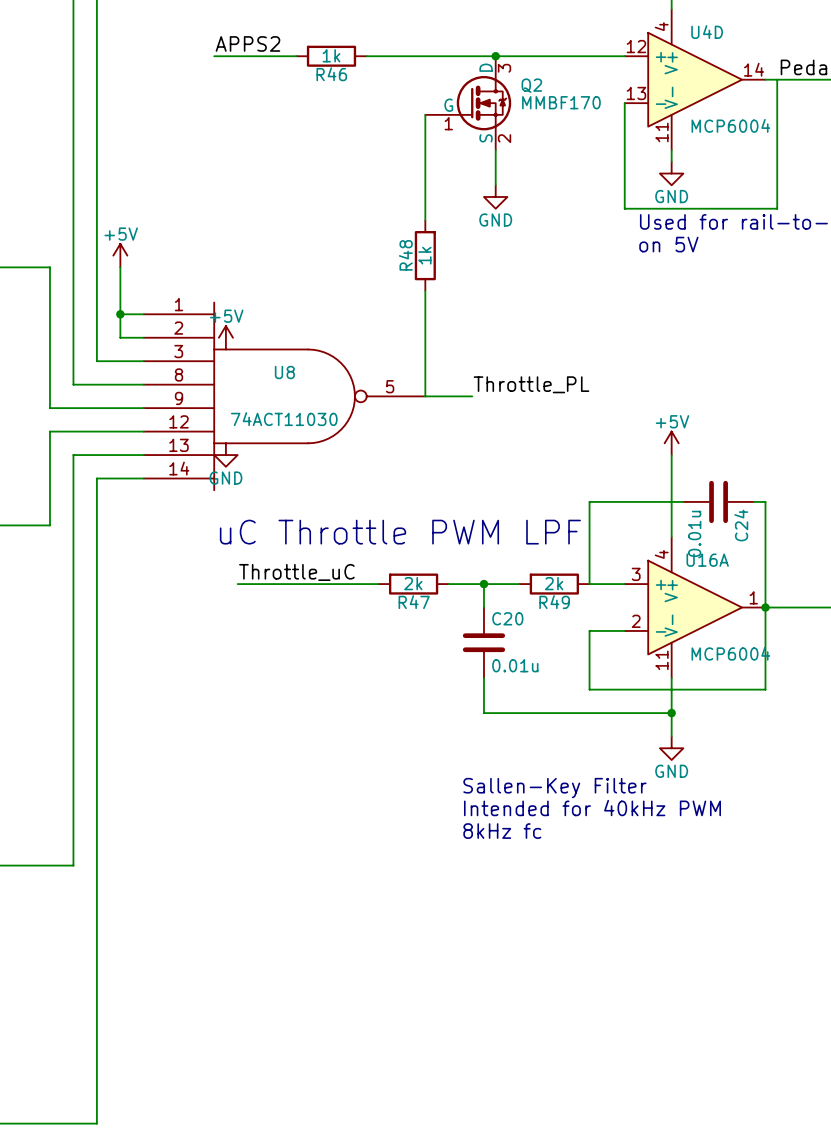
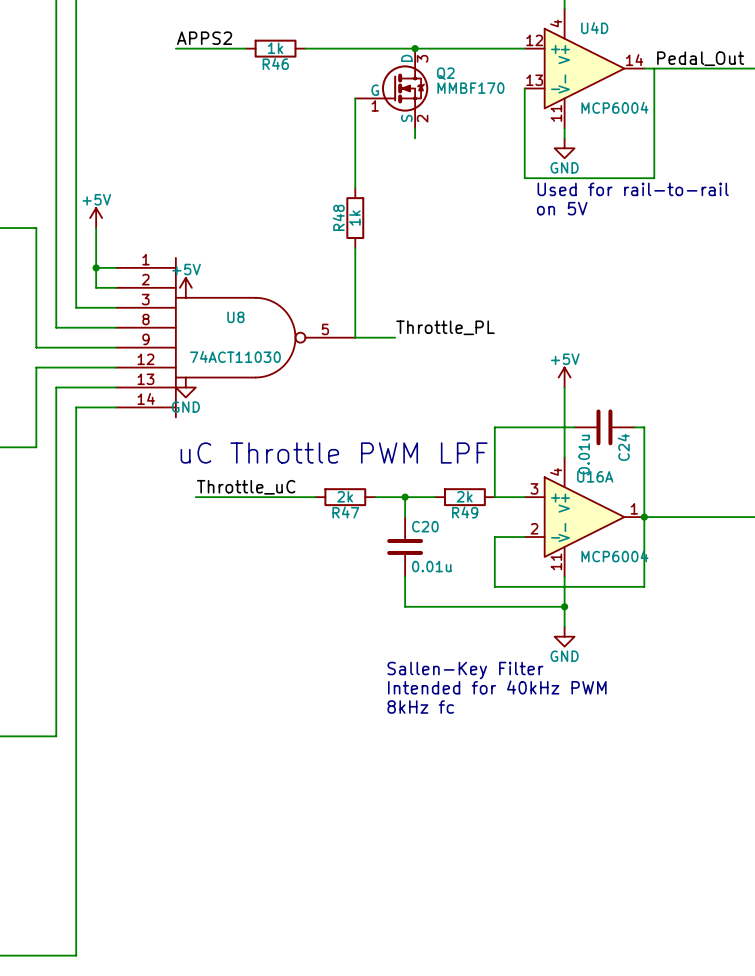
wire: (495, 161) (495, 185) -> none
power symbol: GND (495, 196) -> none

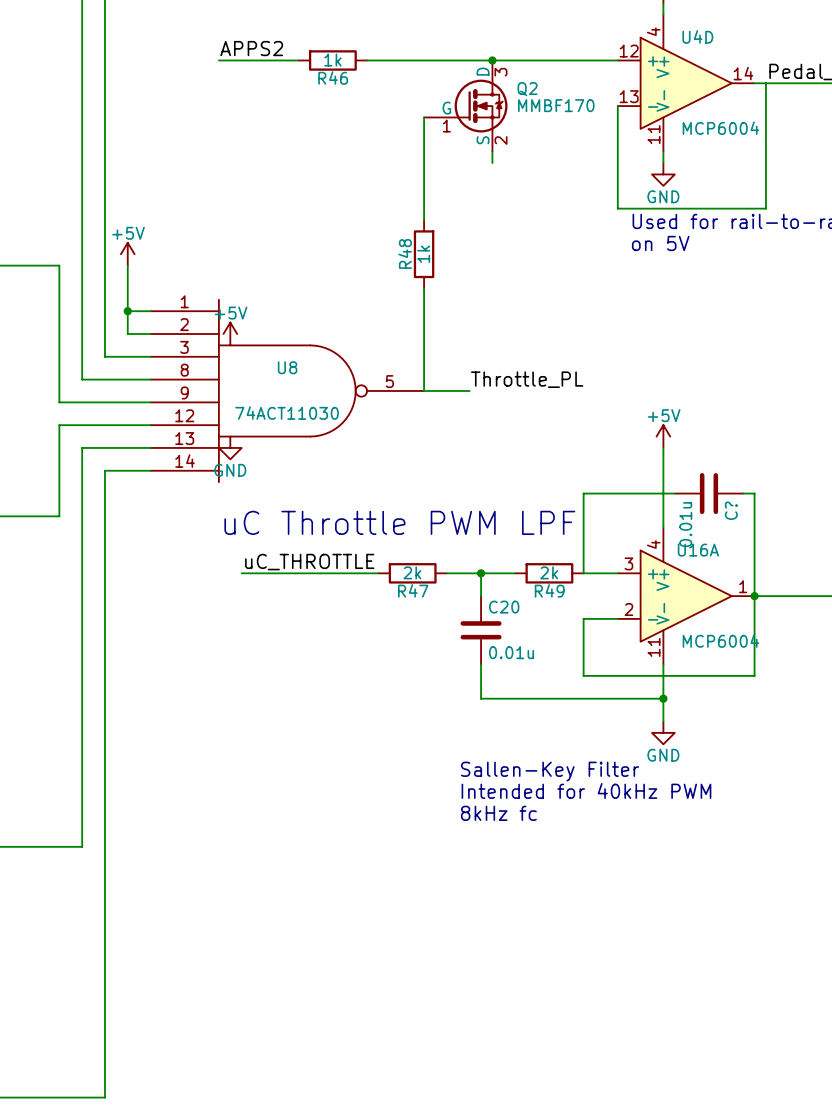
C24 name: C24 (623, 447) -> C? (731, 510)
label: Throttle_uC (246, 487) -> uC_THROTTLE (309, 562)

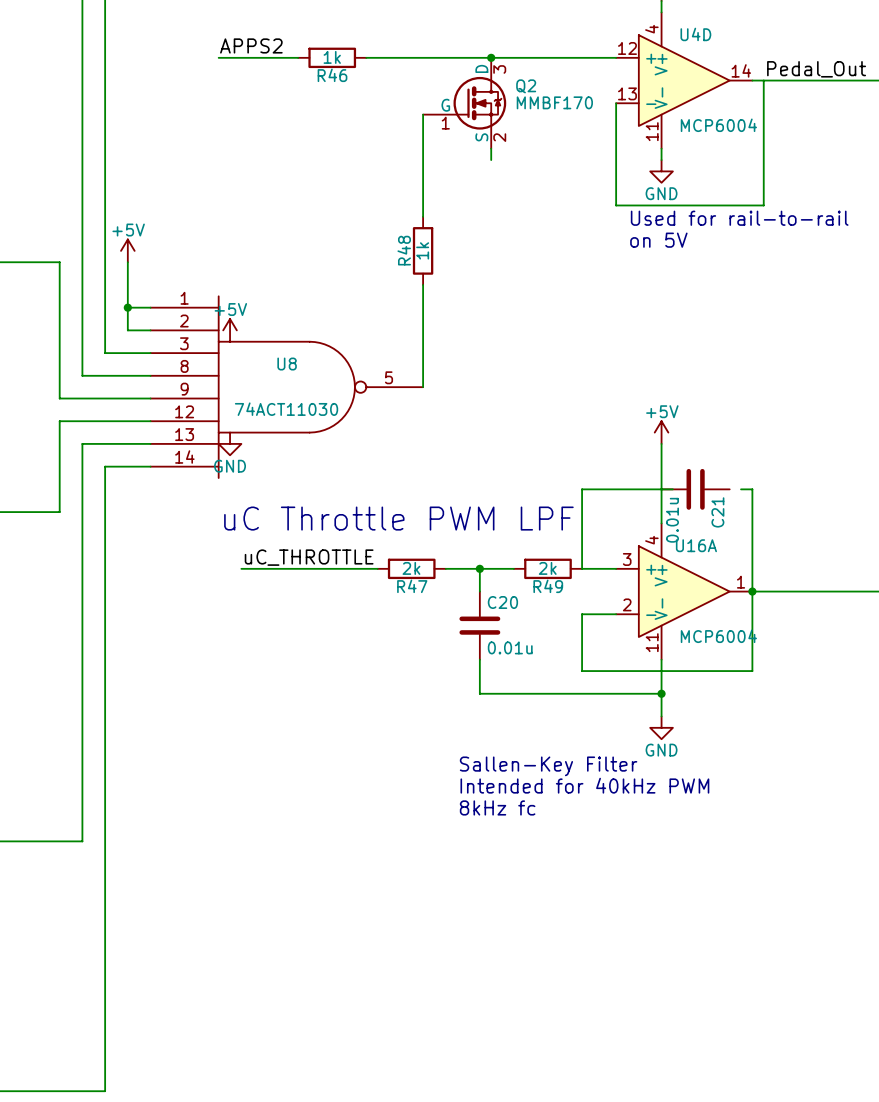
label: Throttle_PL (527, 379) -> none
wire: (424, 390) (469, 390) -> none
C21: none -> 0.01u (695, 489)
C?: 0.01u (708, 493) -> none

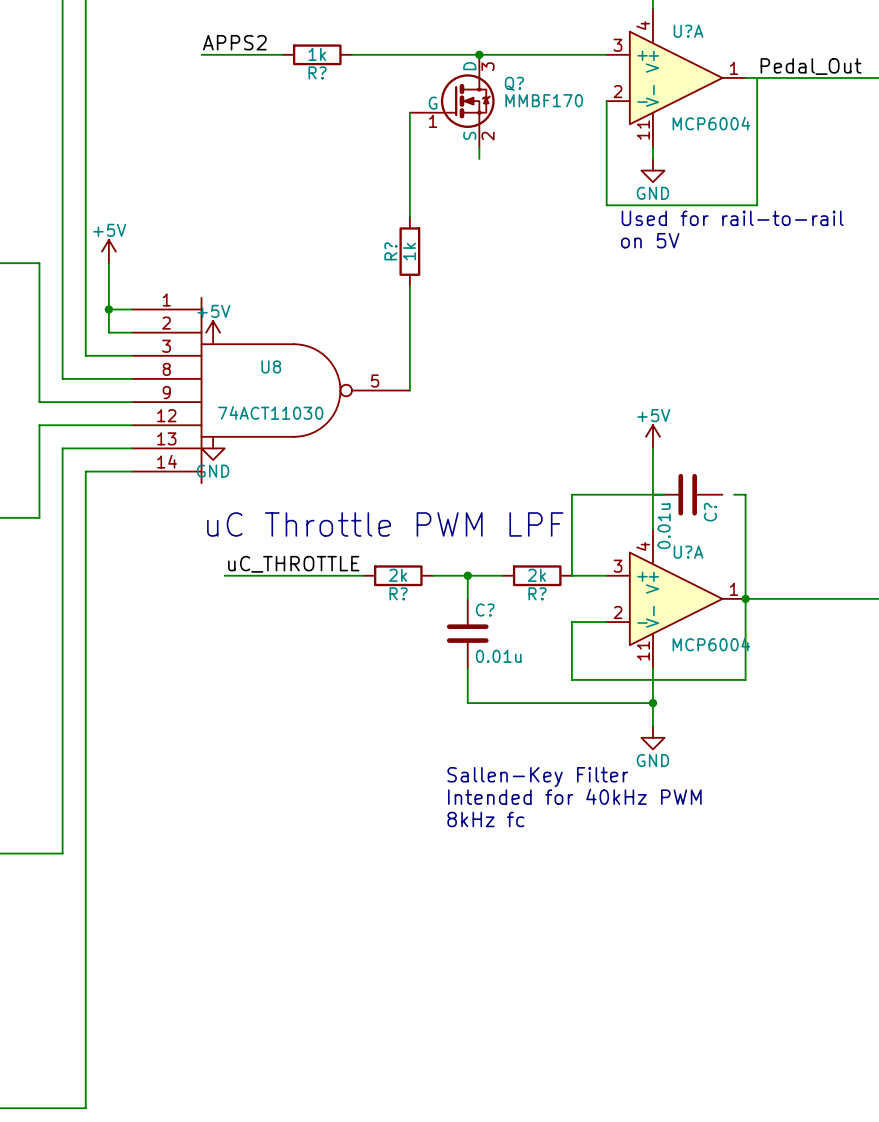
U4D name: U4D (695, 34) -> U?A (688, 31)
U4D pin number: 12 (627, 48) -> 3 (617, 45)
U4D pin number: 14 (741, 70) -> 1 (734, 68)
R46 name: R46 (332, 75) -> R? (317, 72)
Q2 name: Q2 (526, 86) -> Q? (514, 83)
U4D pin number: 13 (627, 93) -> 2 (617, 91)
R48 name: R48 (404, 250) -> R? (390, 251)
C21 name: C21 (717, 512) -> C? (710, 512)
U16A name: U16A (696, 545) -> U?A (688, 552)
R47 name: R47 (412, 586) -> R? (398, 593)
R49 name: R49 (548, 586) -> R? (537, 593)
C20 name: C20 (502, 602) -> C? (485, 610)

